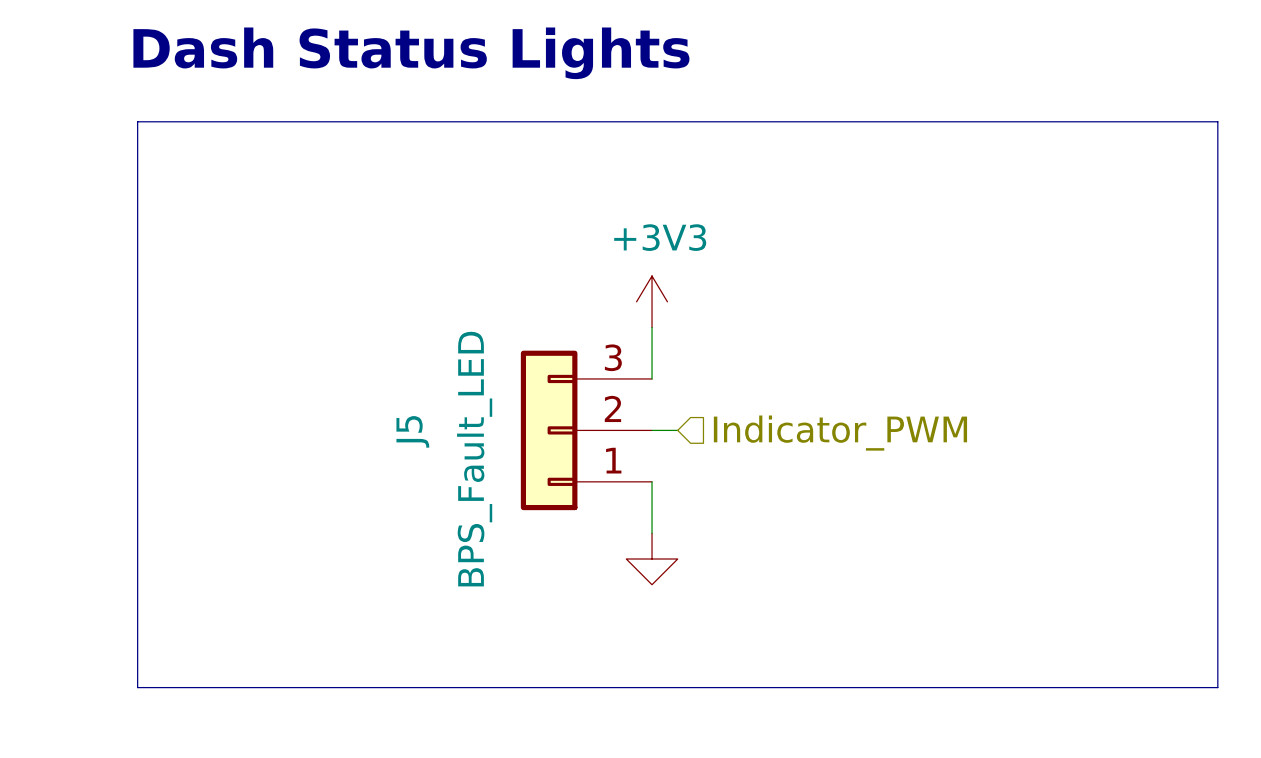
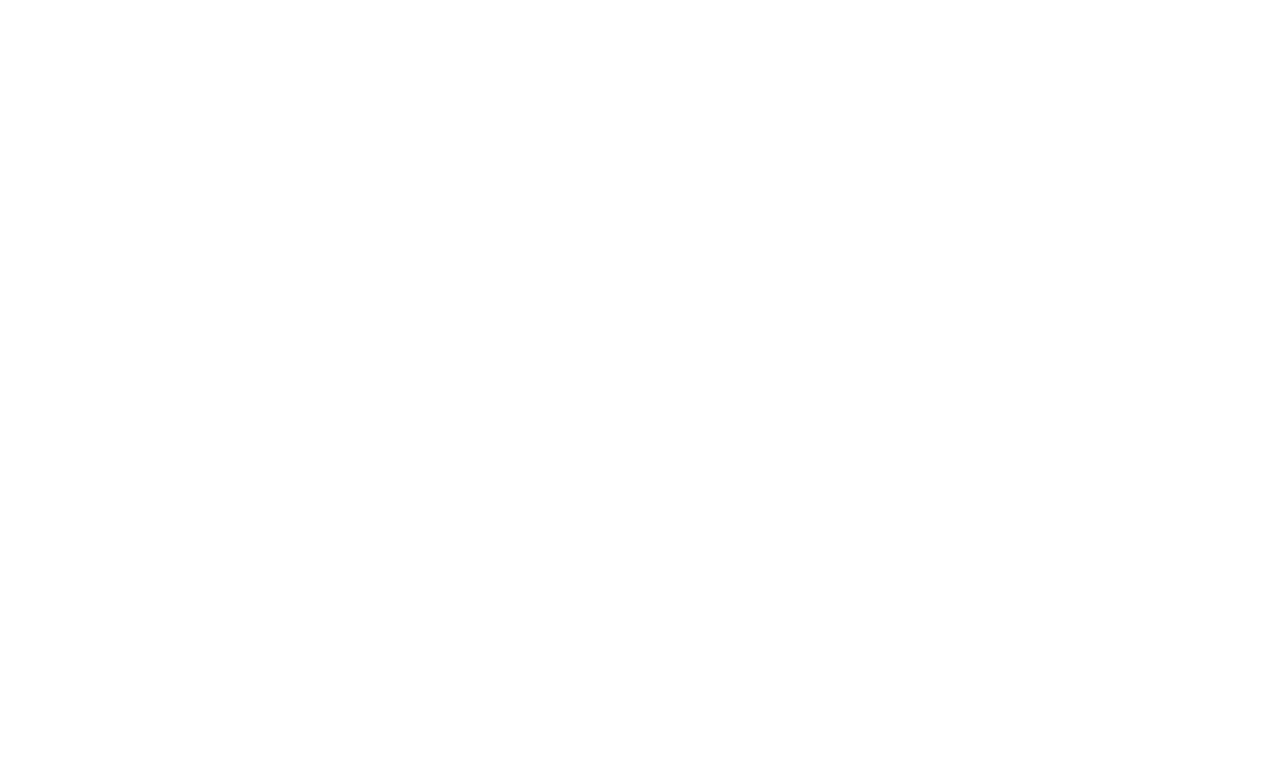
text: Dash Status Lights (411, 53) -> none
line: (137, 121) (1217, 121) (1217, 687) (137, 687) (137, 121) -> none
power symbol: +3V3 (652, 301) -> none
wire: (652, 327) (652, 378) -> none
J5: BPS_Fault_LED (586, 430) -> none
wire: (652, 430) (677, 430) -> none
hierarchical label: Indicator_PWM (840, 433) -> none
wire: (652, 481) (652, 533) -> none
power symbol: (652, 559) -> none

